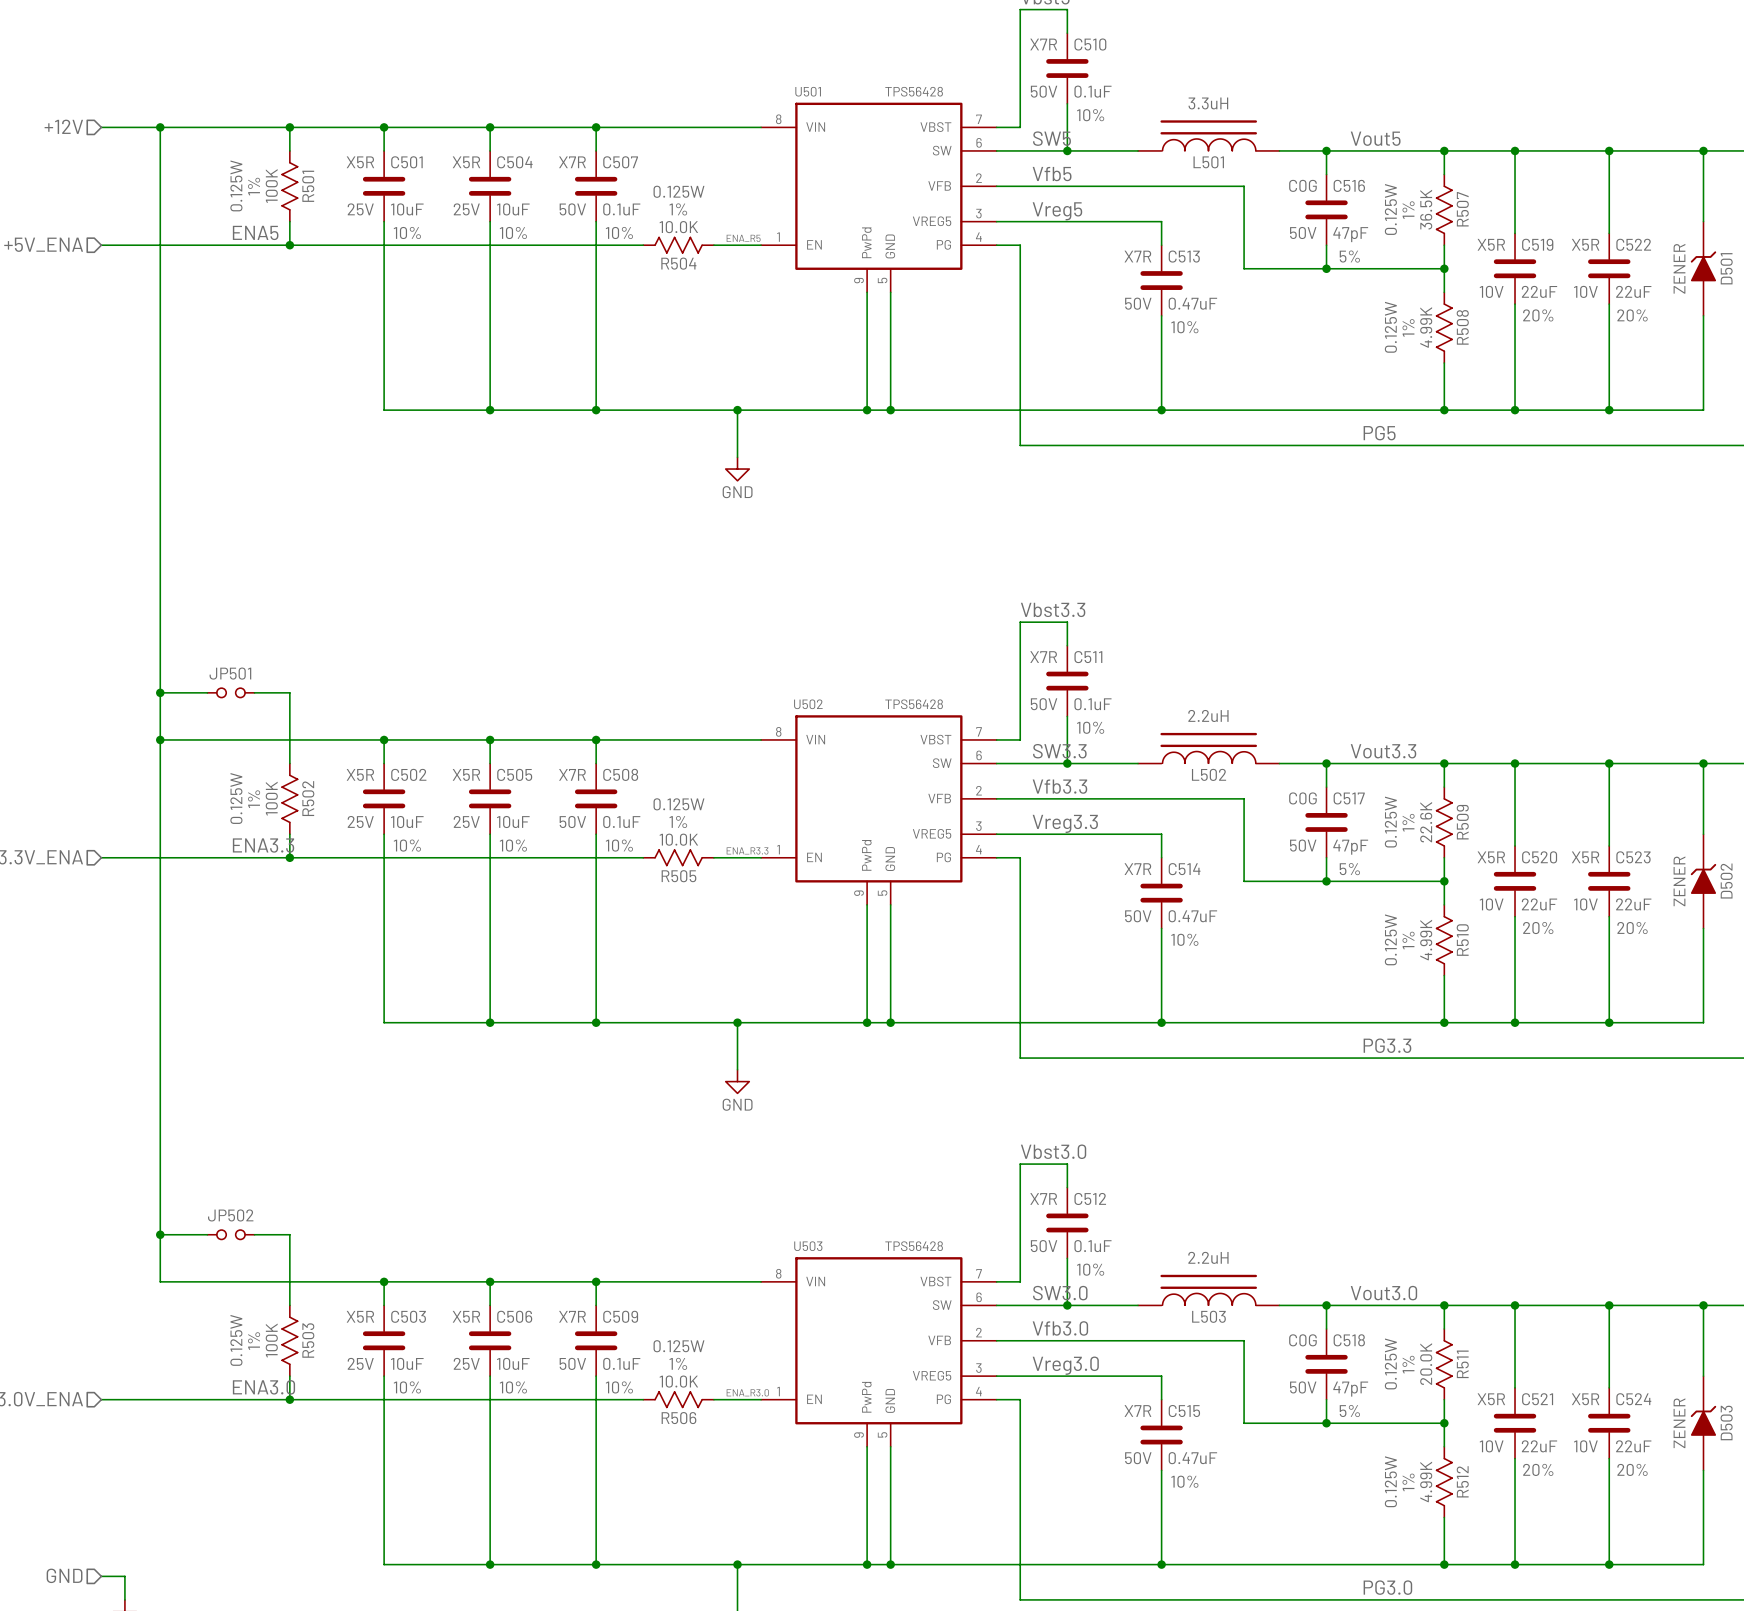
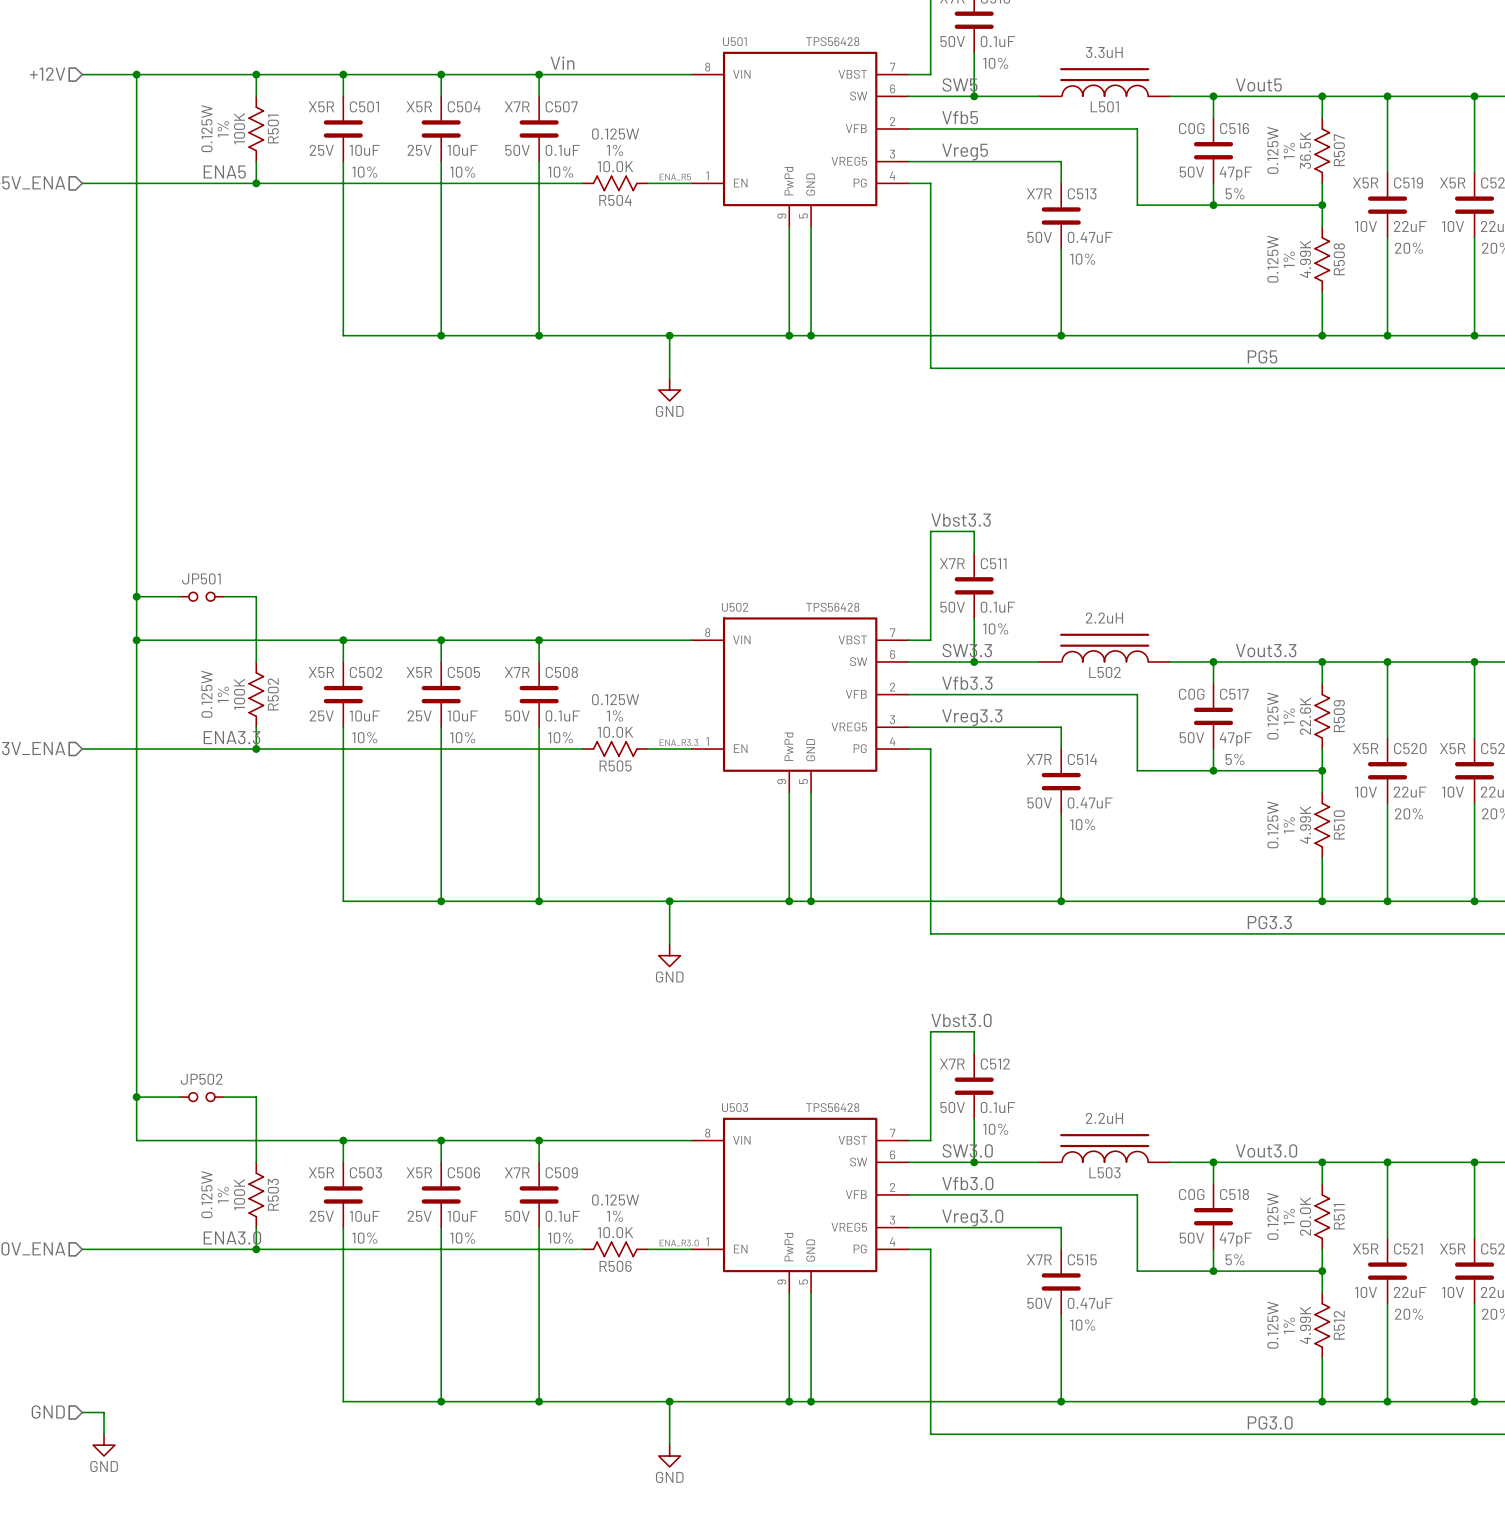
label: none -> Vin (562, 63)

